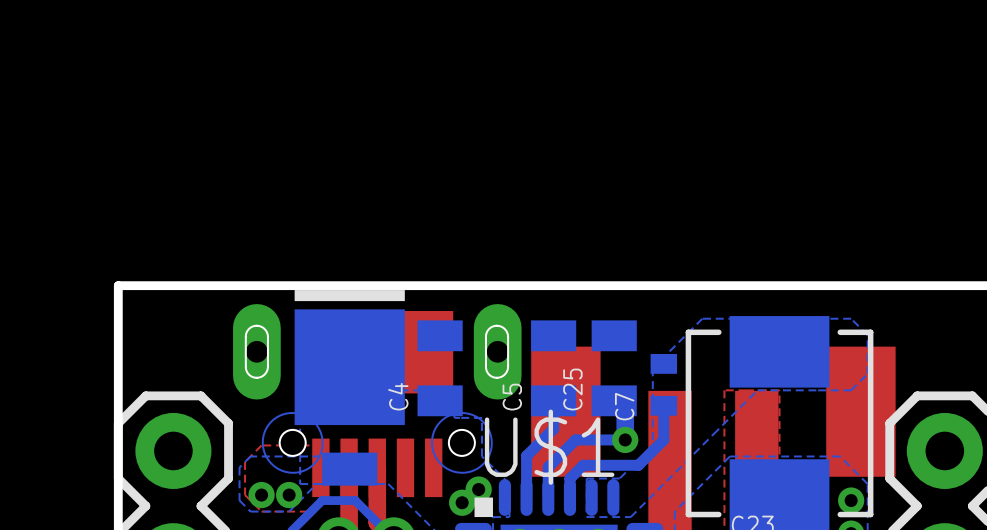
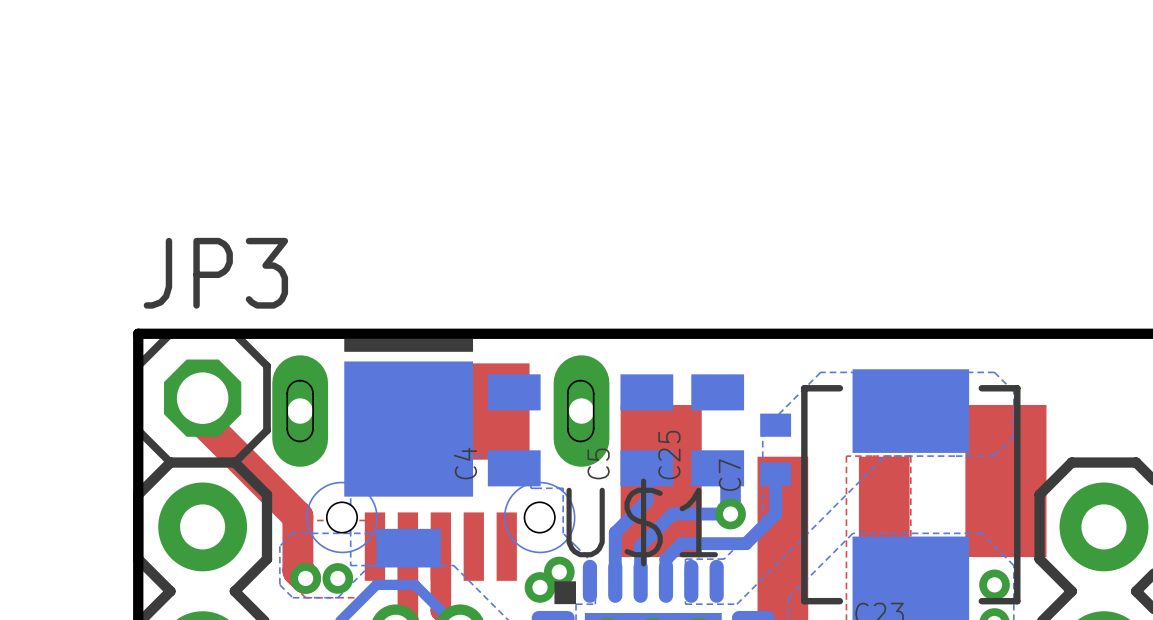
top track: none -> (202, 398) (202, 421) (297, 516) (297, 570) (305, 578)
JP3: none -> (202, 398)

